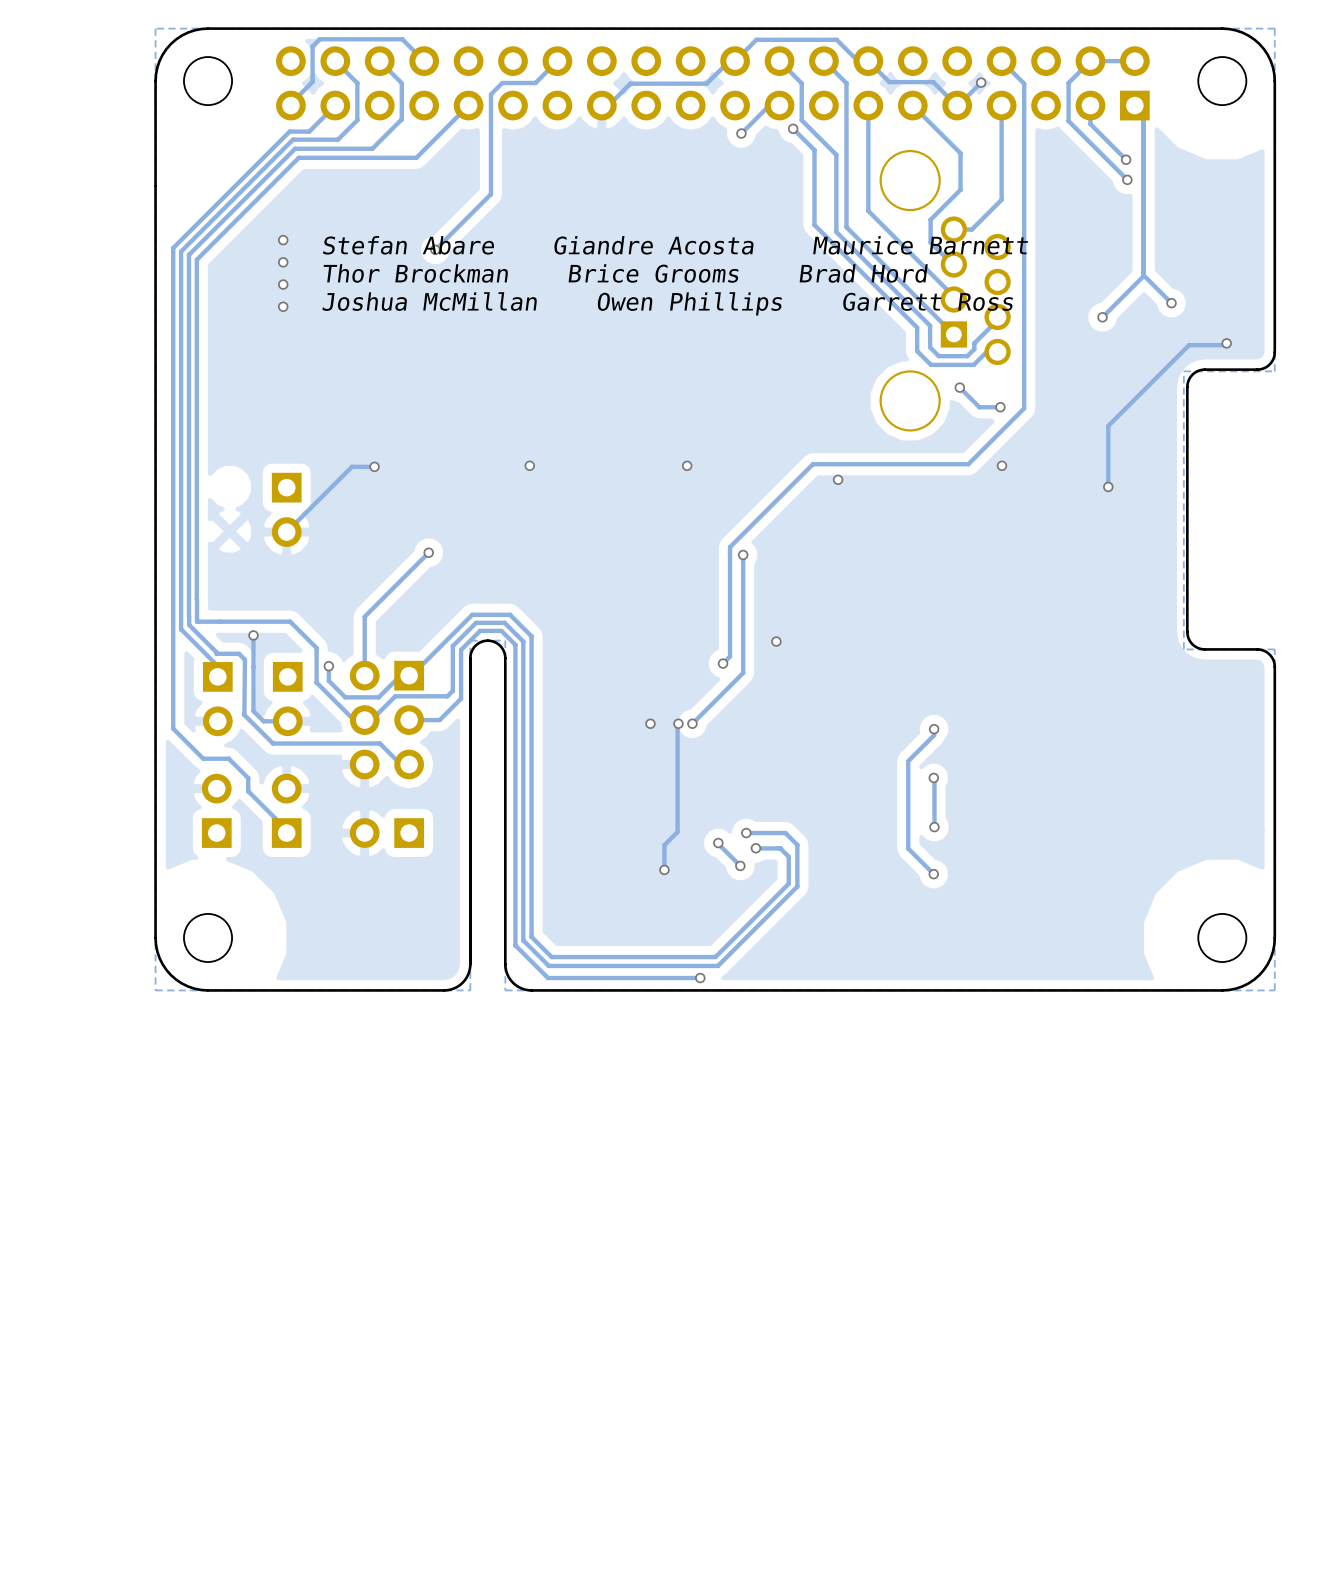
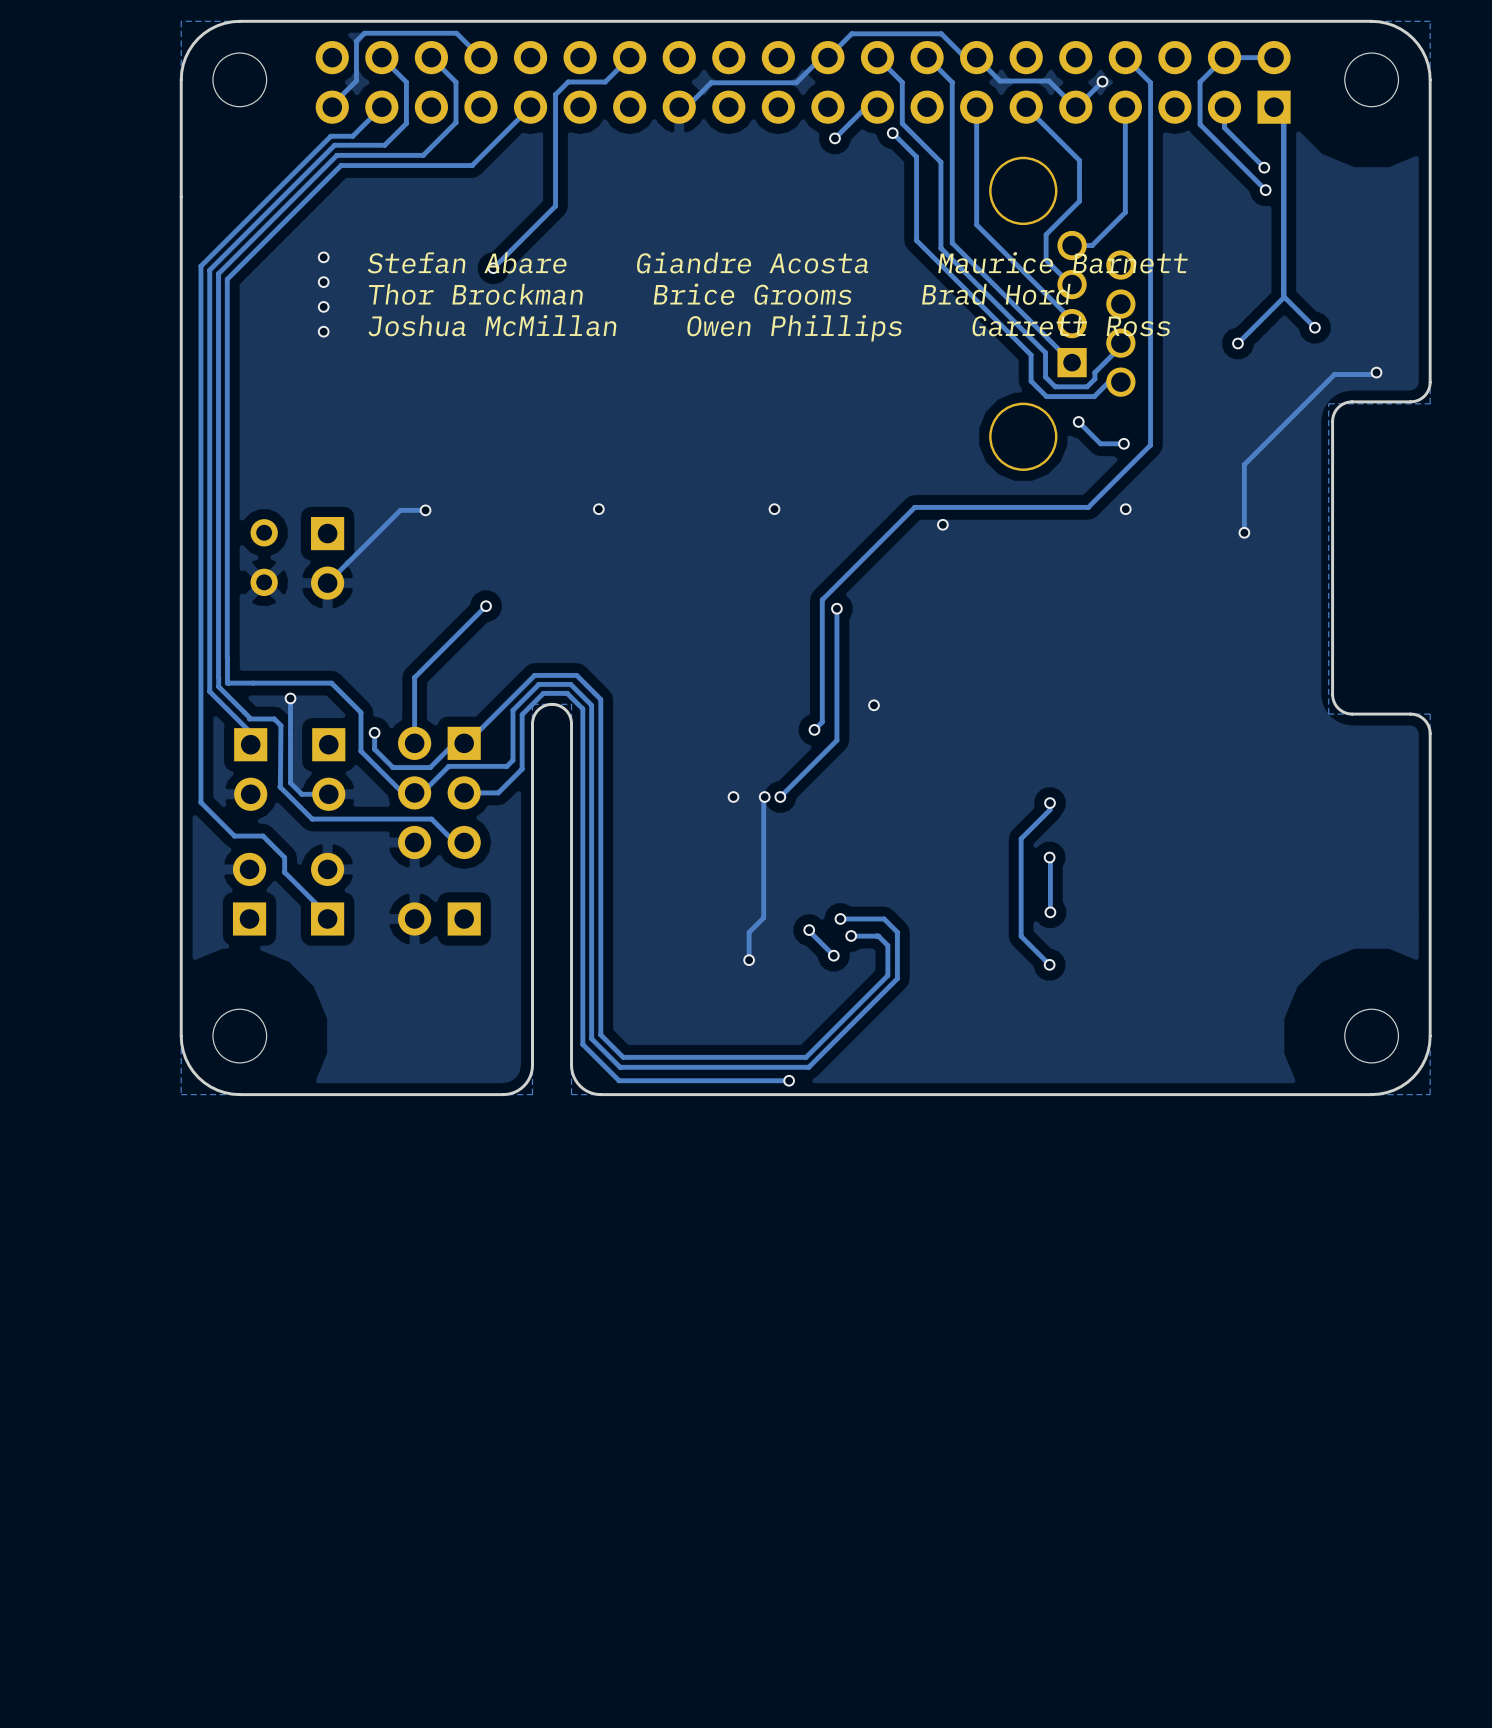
part: none -> (264, 557)

